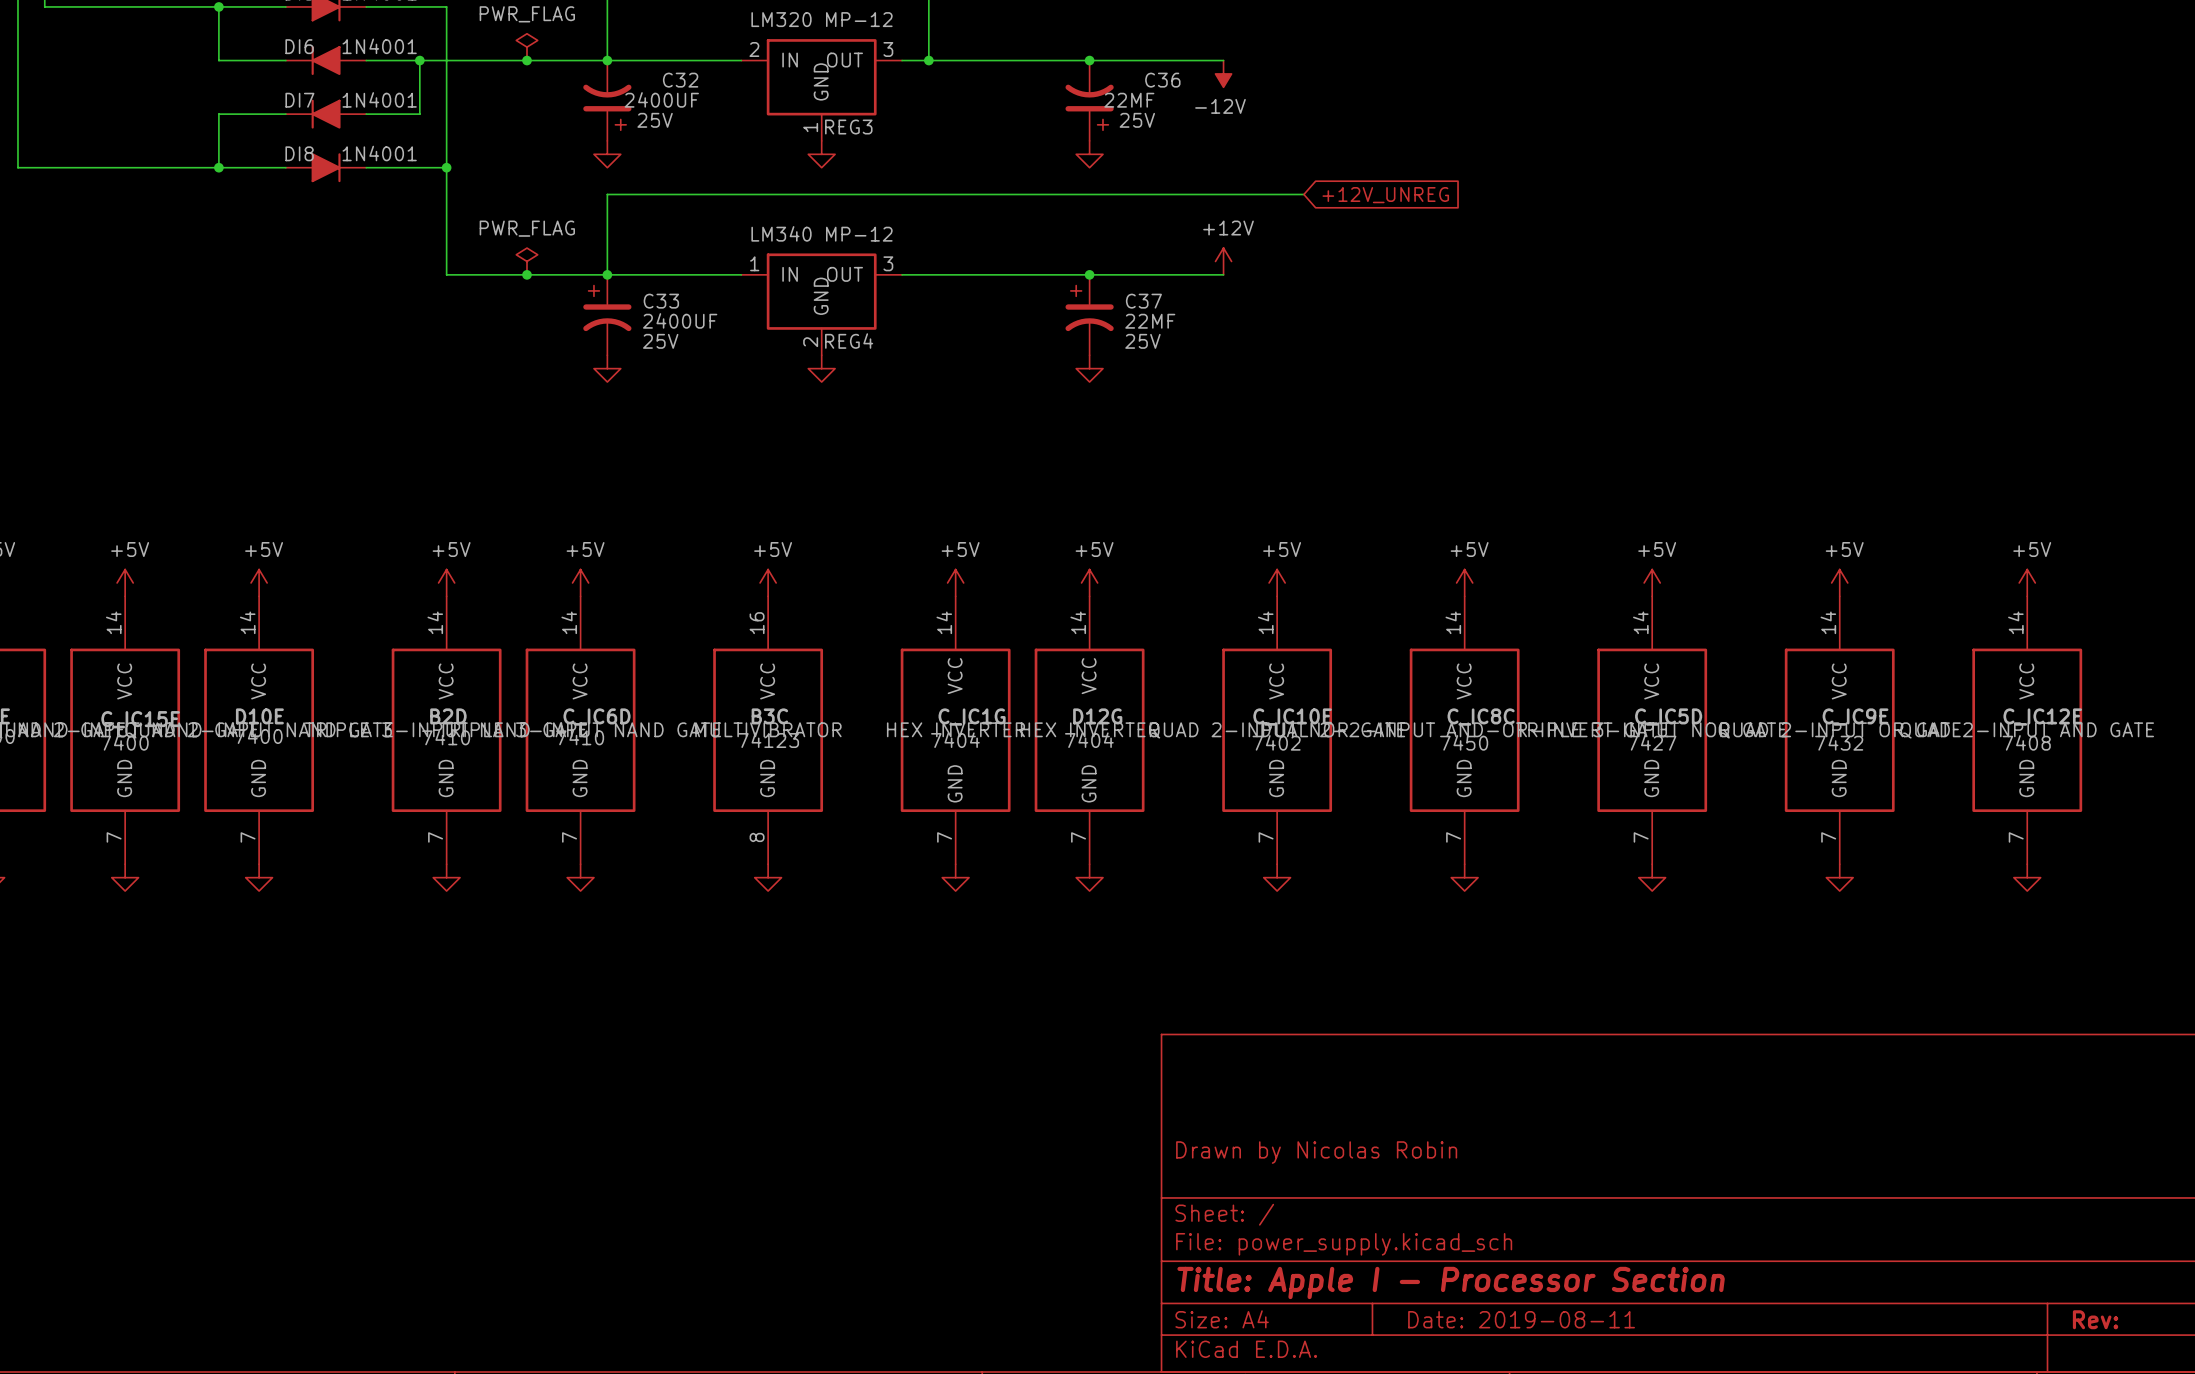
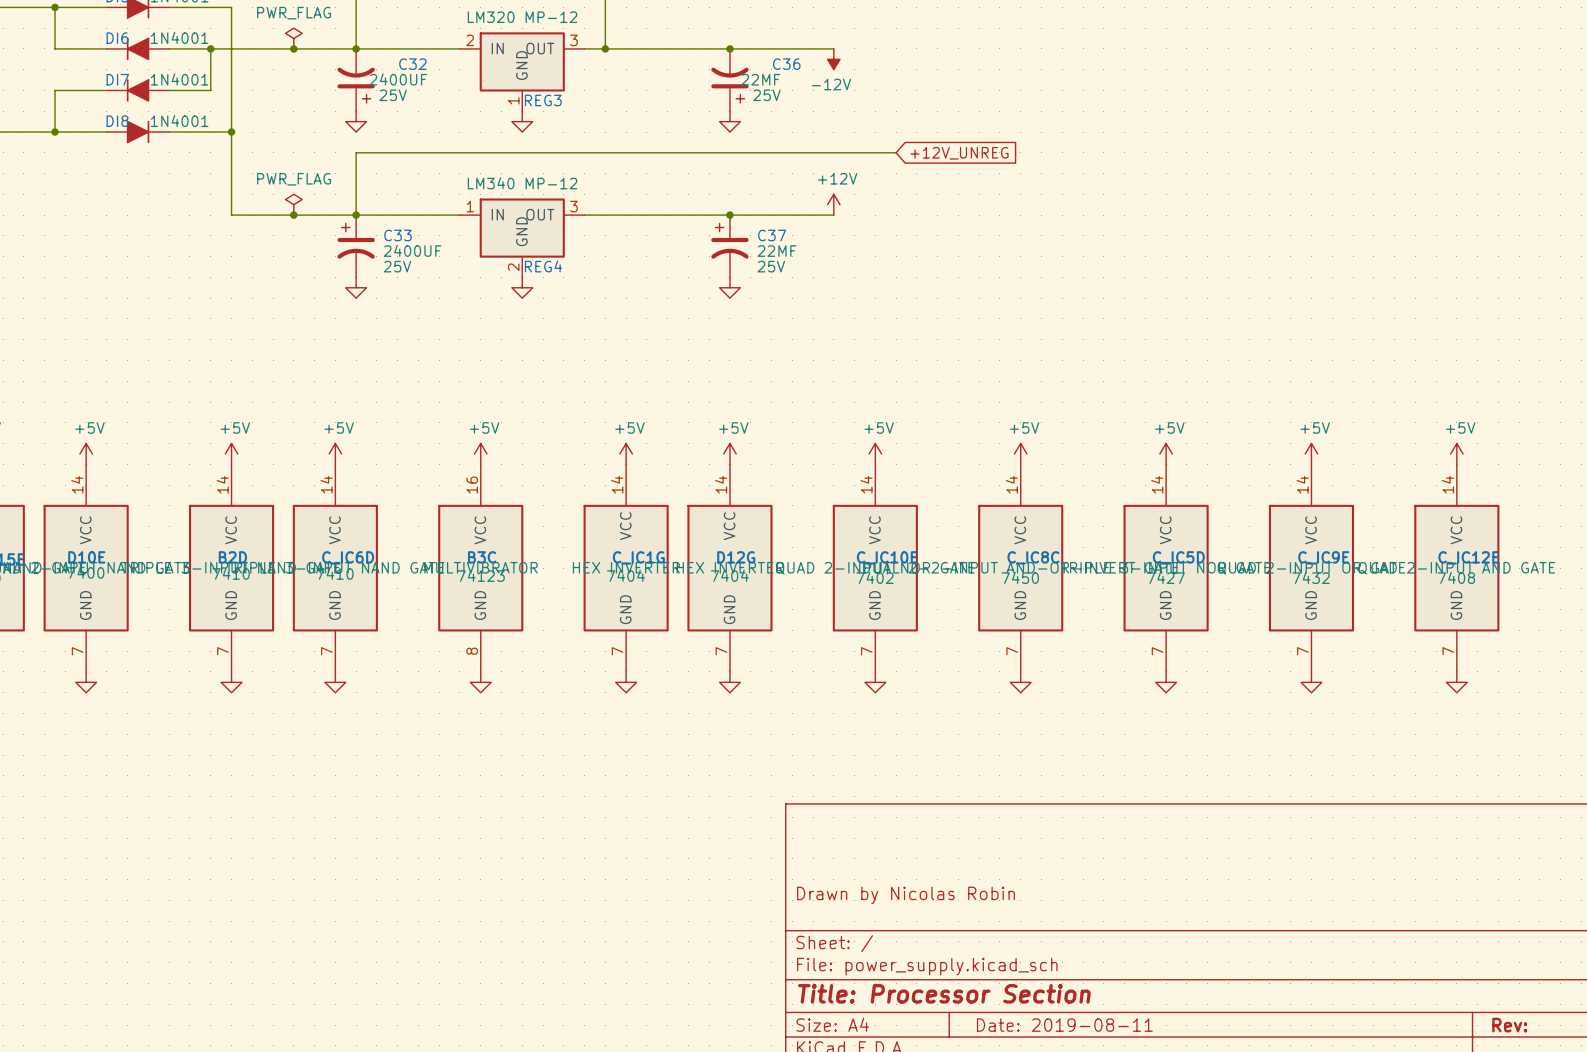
title block: Title: Apple I - Processor Section (1451, 1282) -> Title: Processor Section (944, 993)

